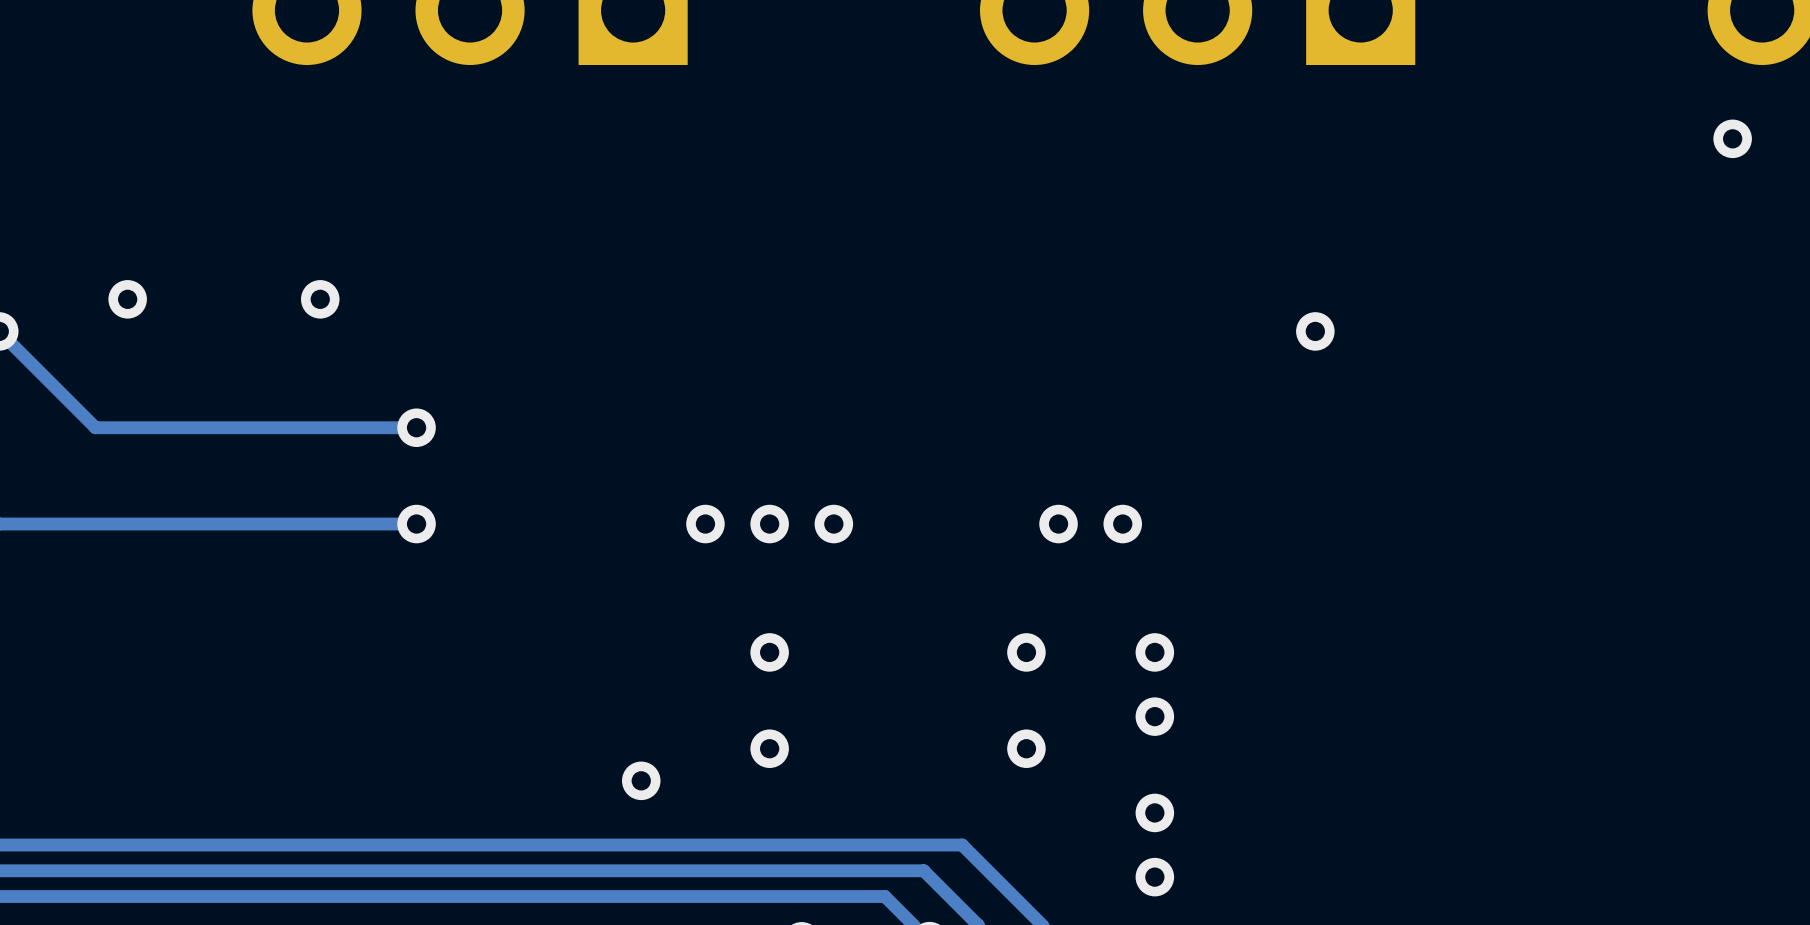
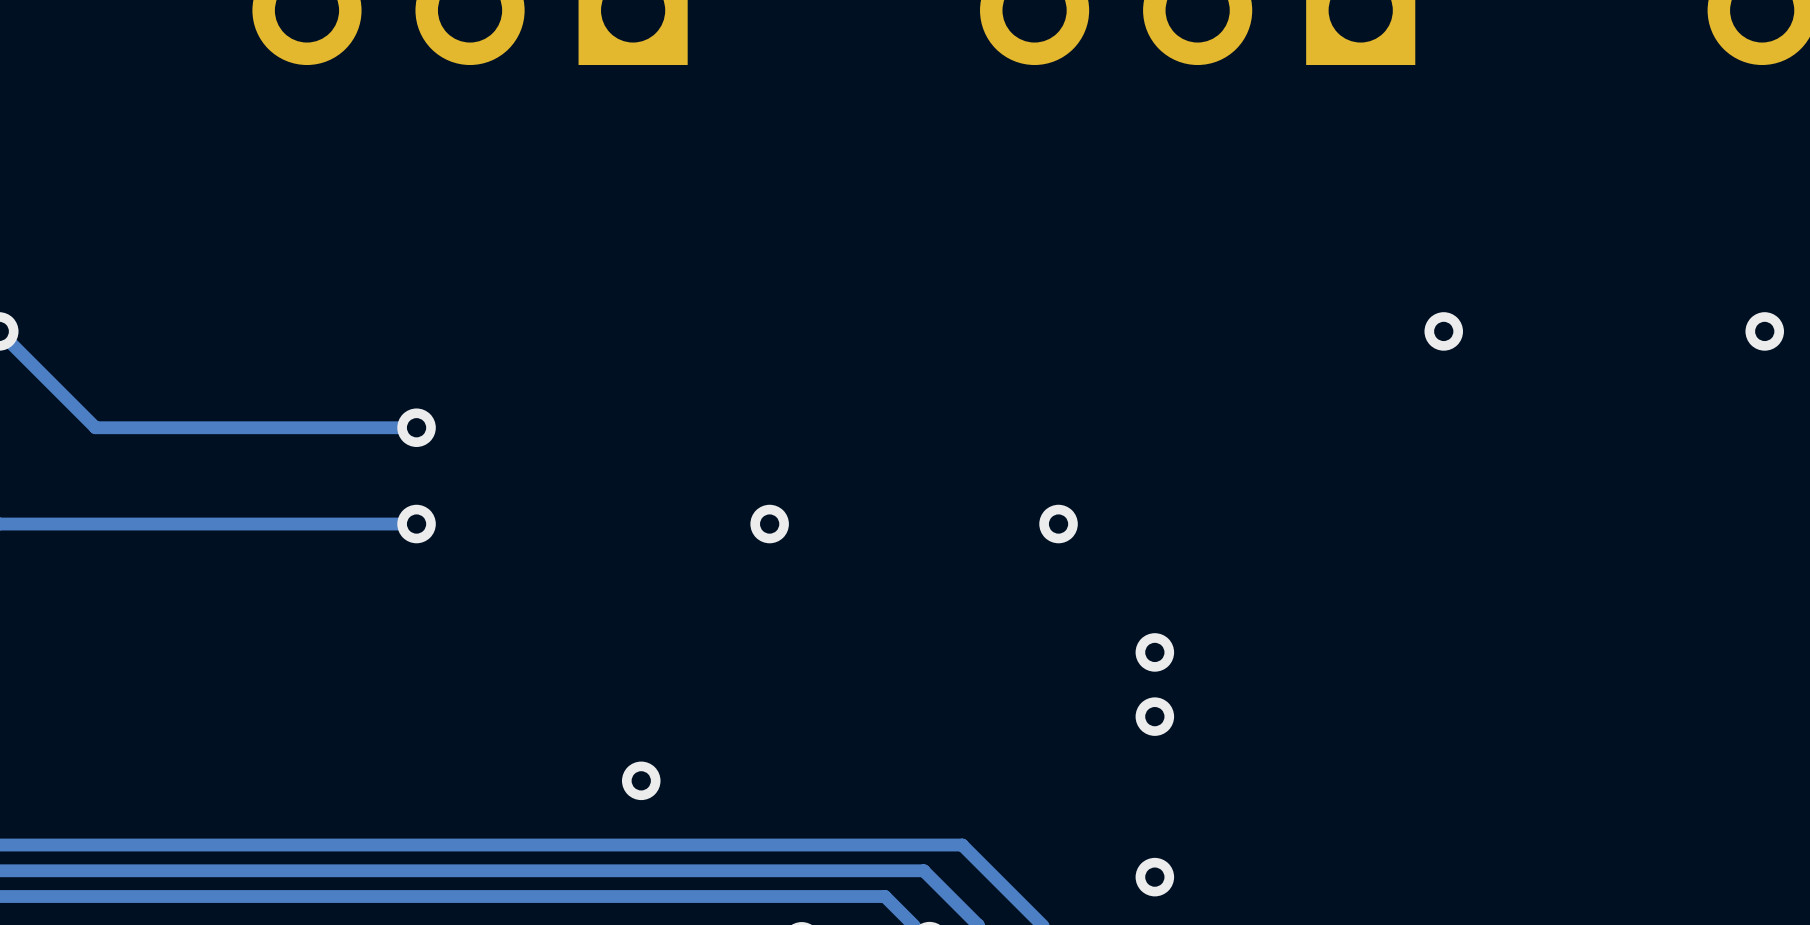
via: (1732, 138) -> none
via: (127, 299) -> none
via: (320, 299) -> none
via position: (1315, 331) -> (1443, 331)
via: none -> (1764, 331)
via: (705, 524) -> none
via: (833, 524) -> none
via: (1122, 524) -> none
via: (769, 652) -> none
via: (1026, 652) -> none
via: (769, 748) -> none
via: (1026, 748) -> none
via: (1154, 812) -> none

